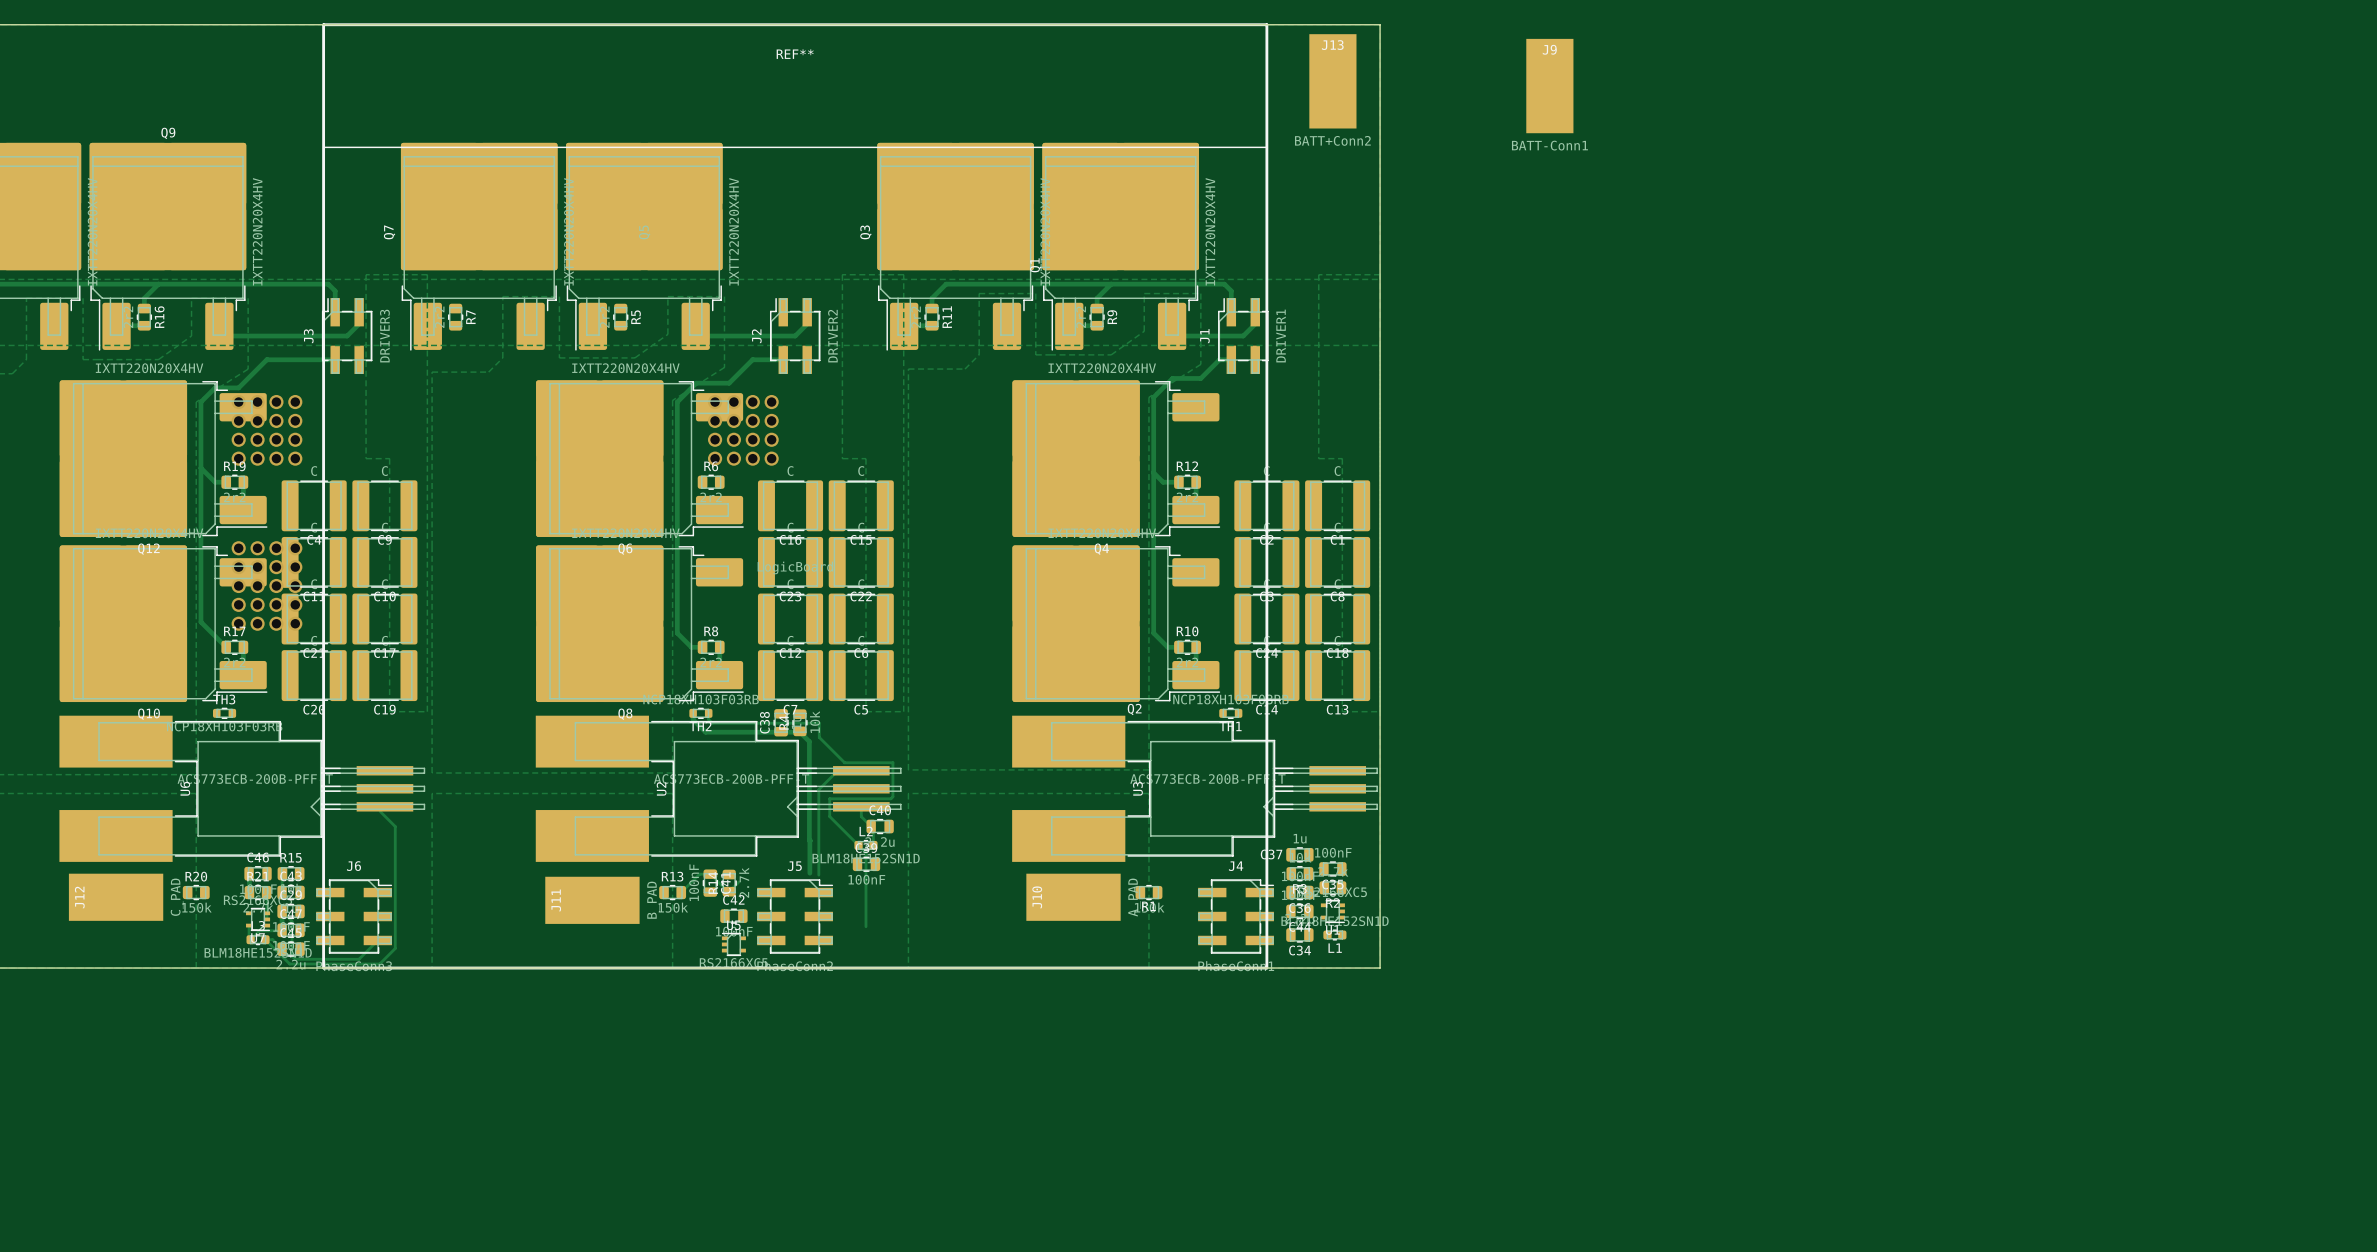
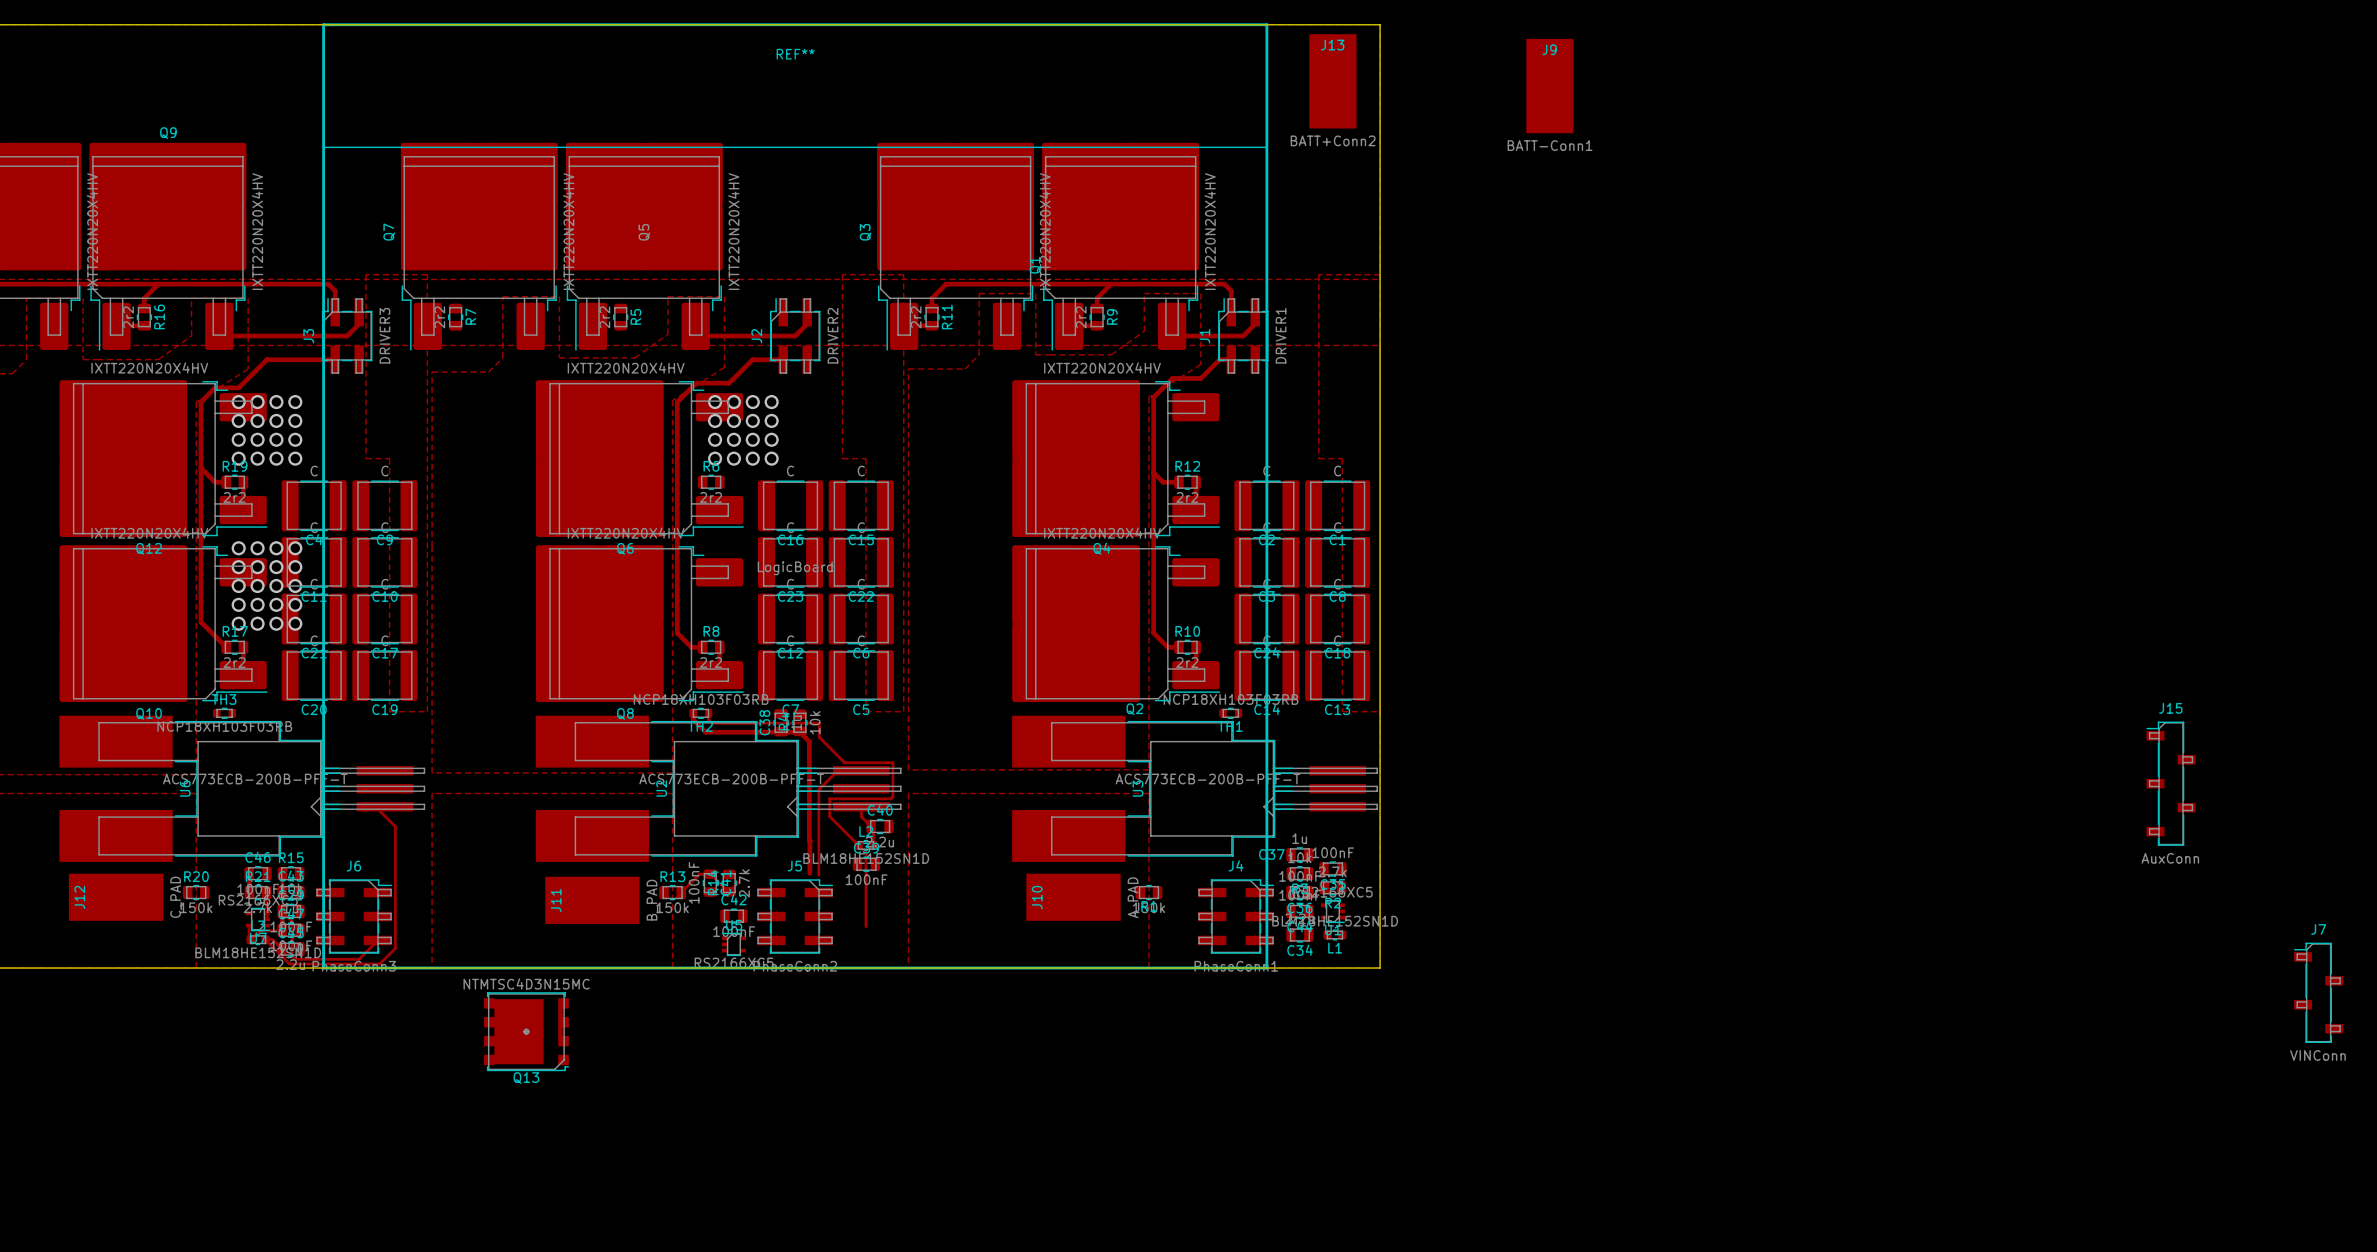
J15: none -> AuxConn (2171, 783)
J7: none -> VINConn (2318, 992)
Q13: none -> NTMTSC4D3N15MC (526, 1031)

